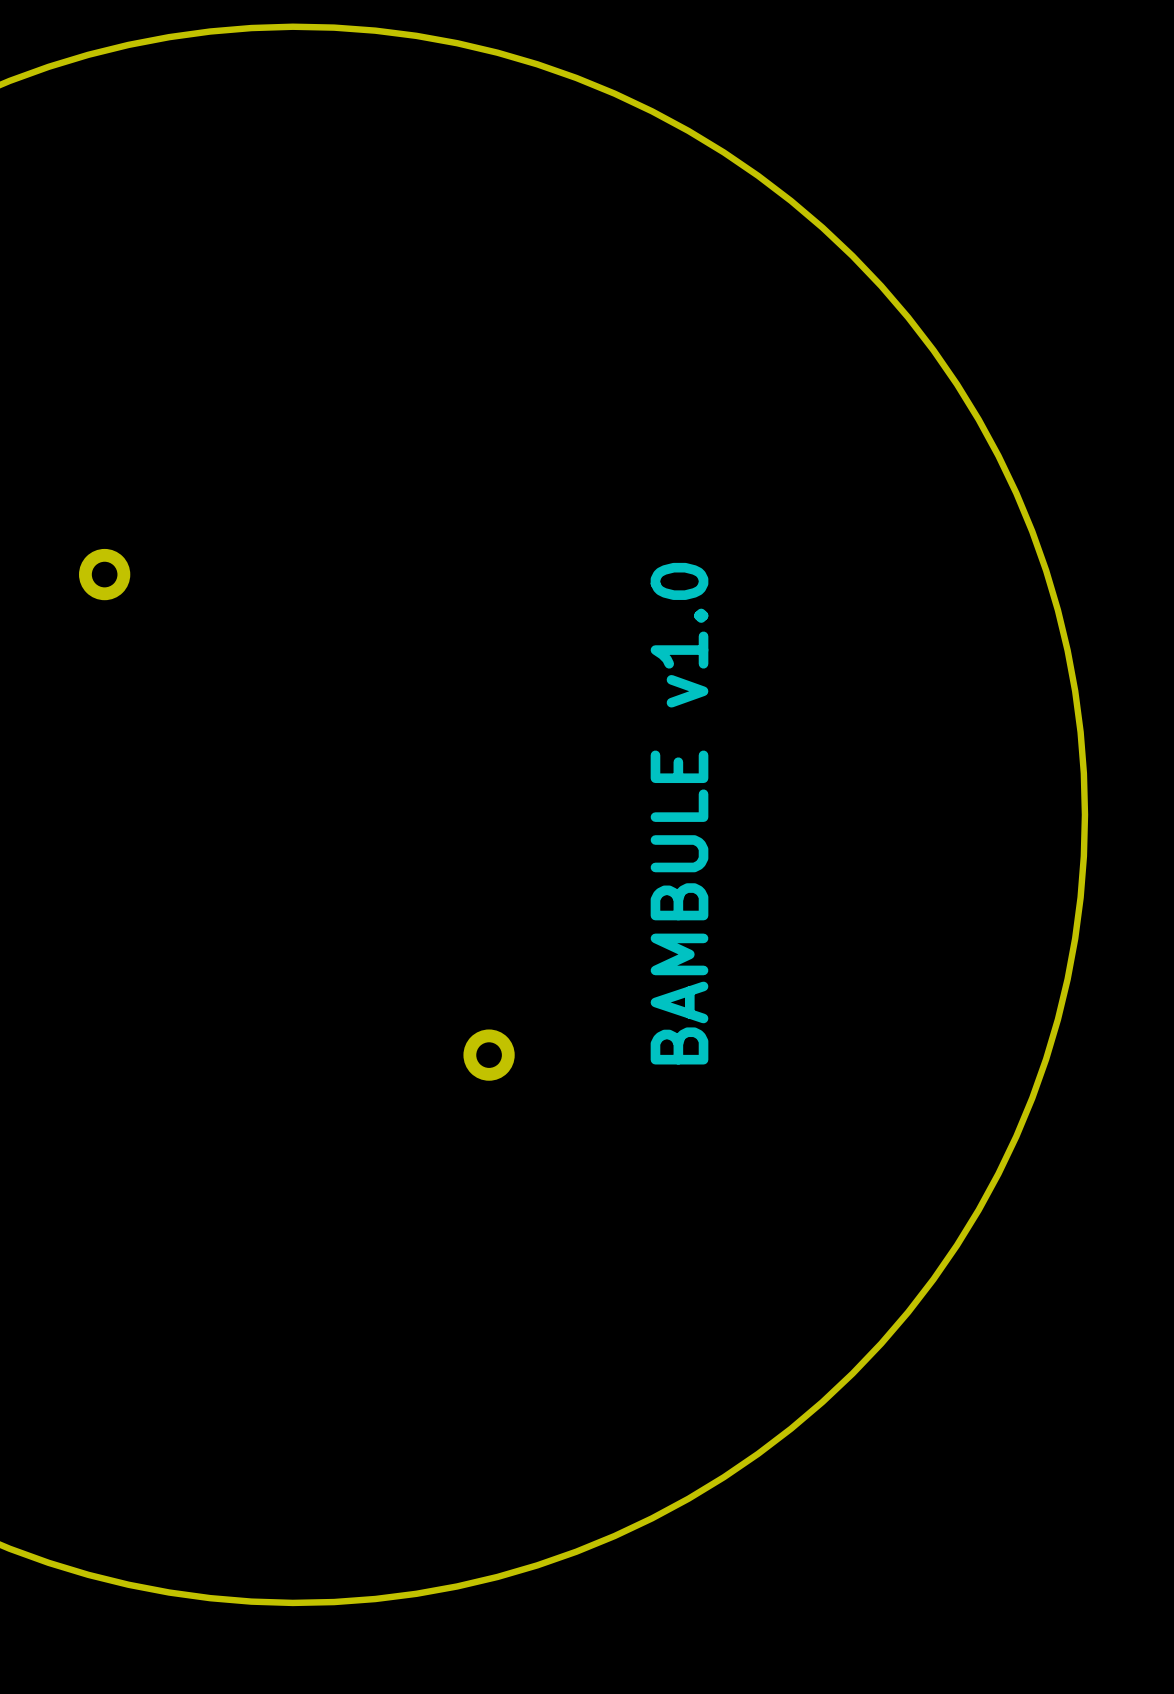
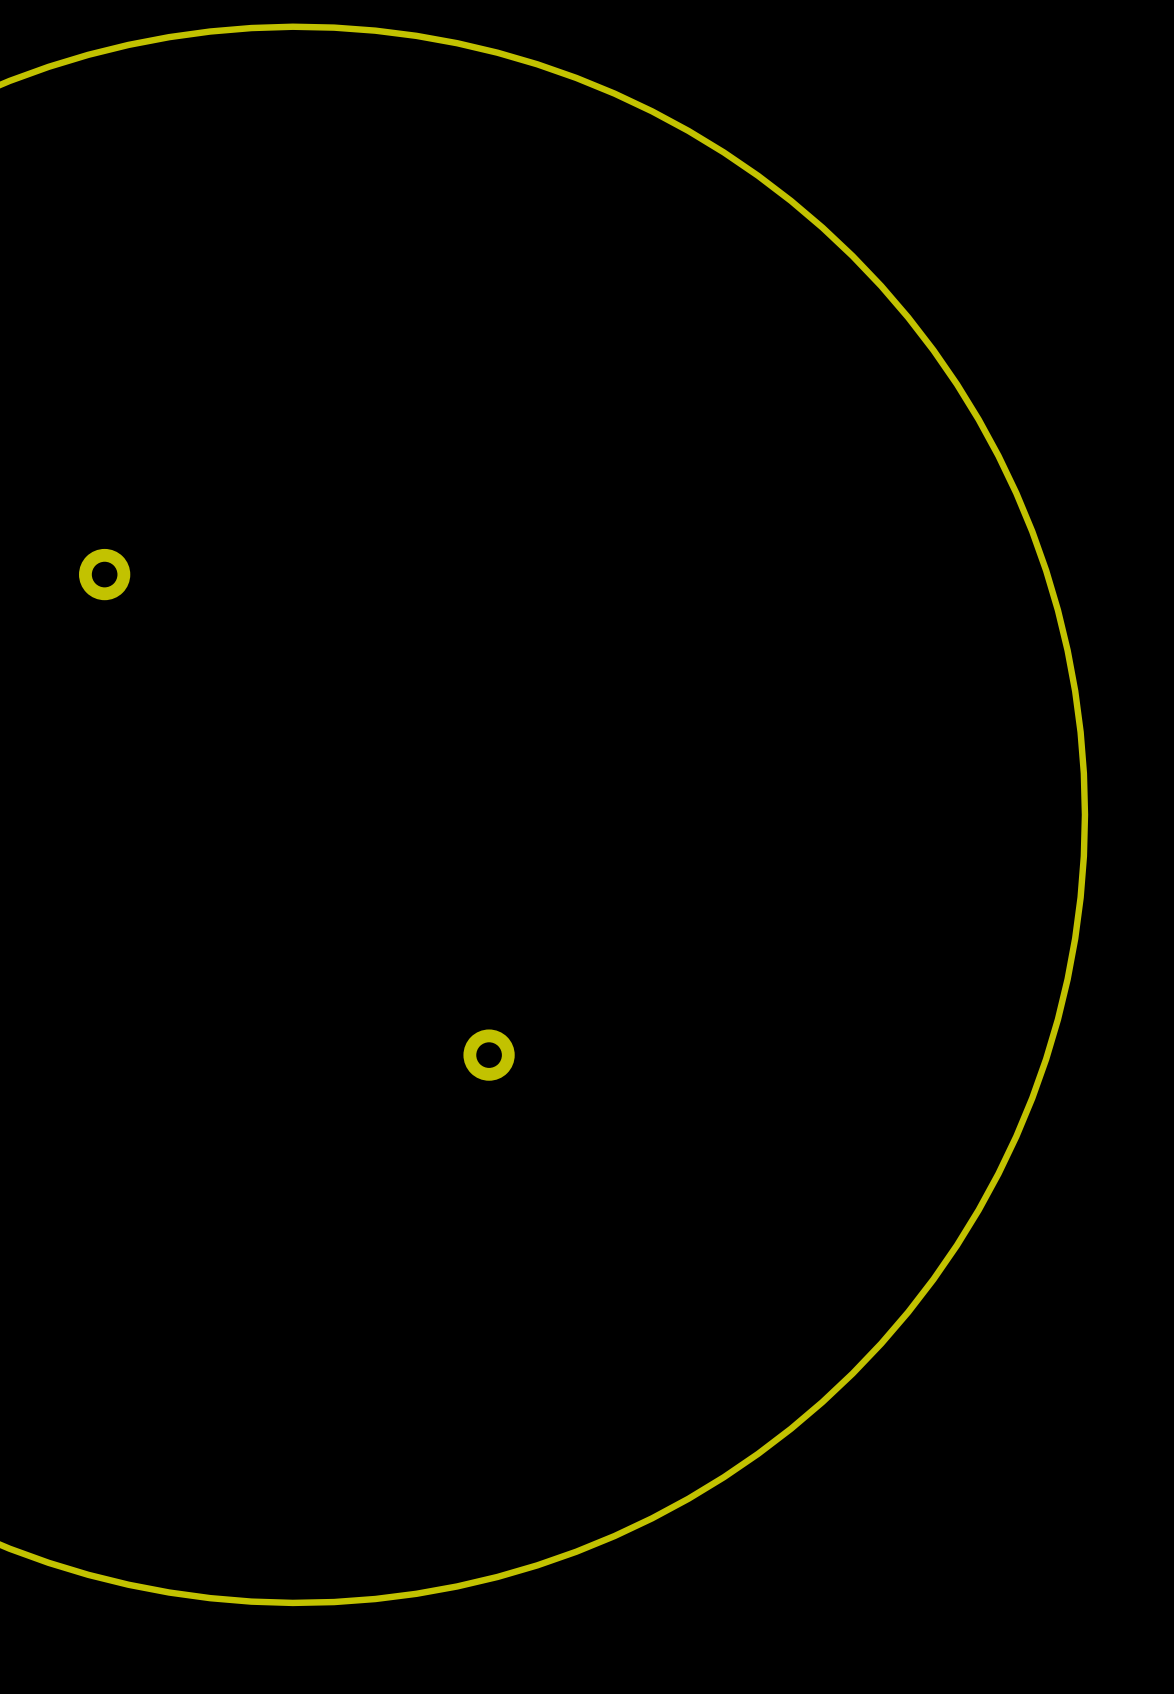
text: BAMBULE v1.0 (679, 813) -> none

